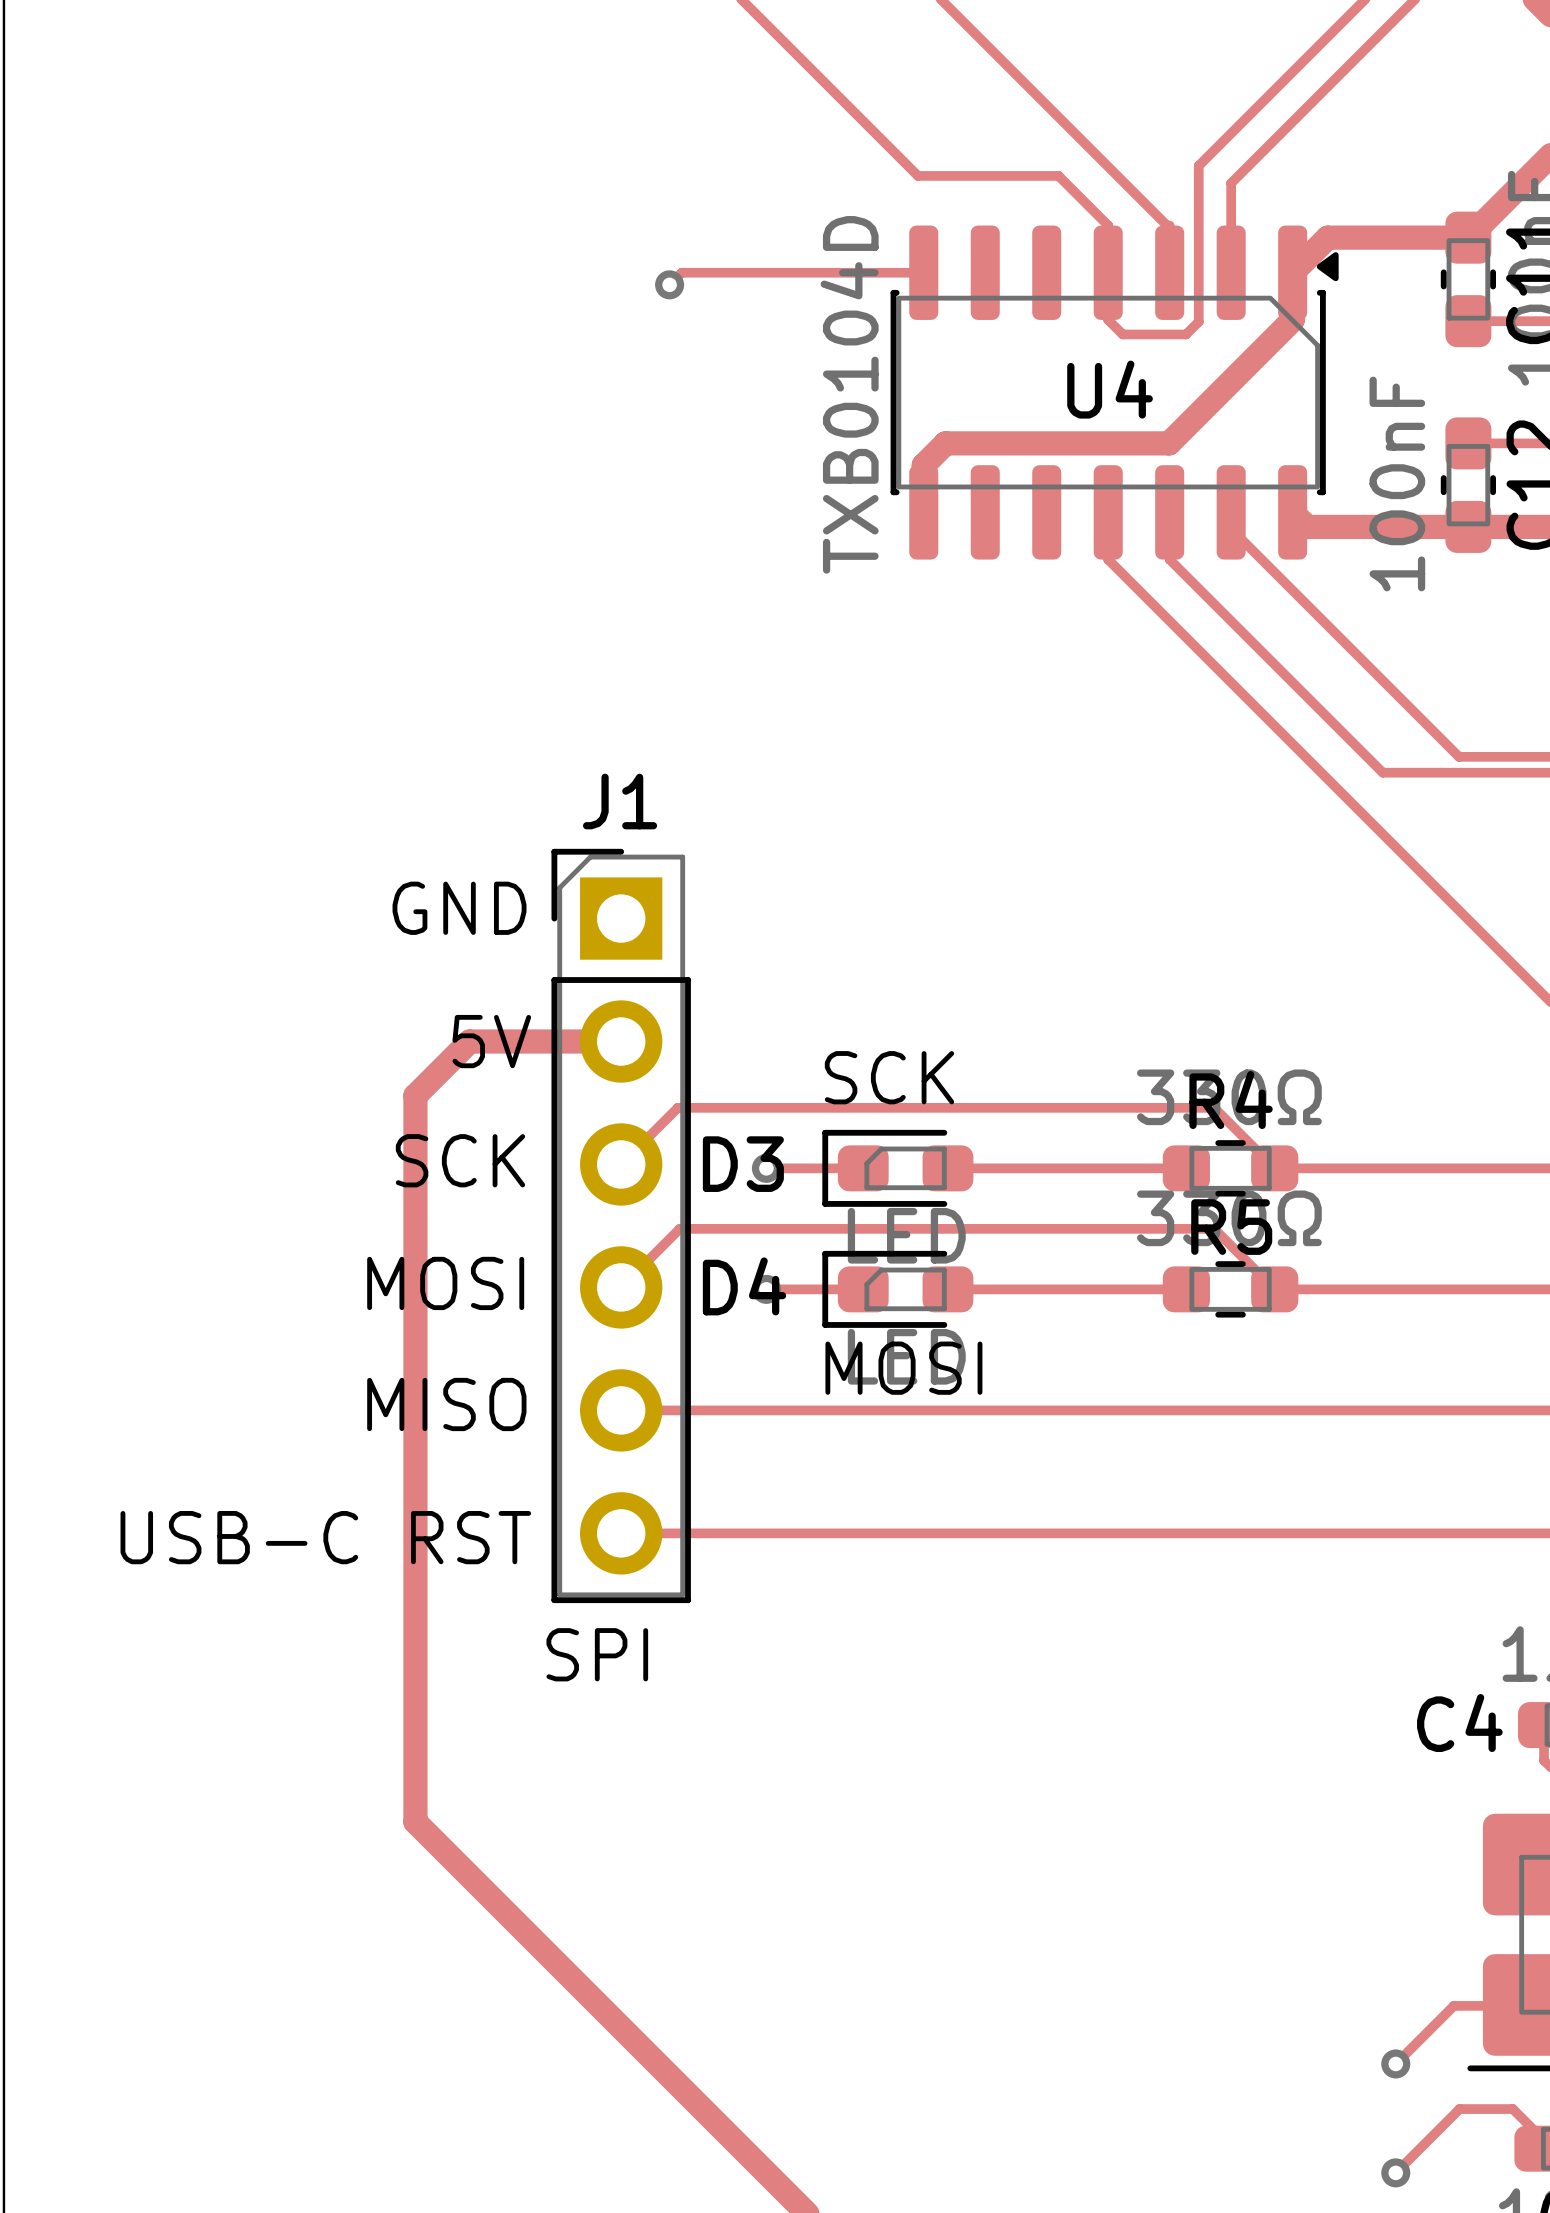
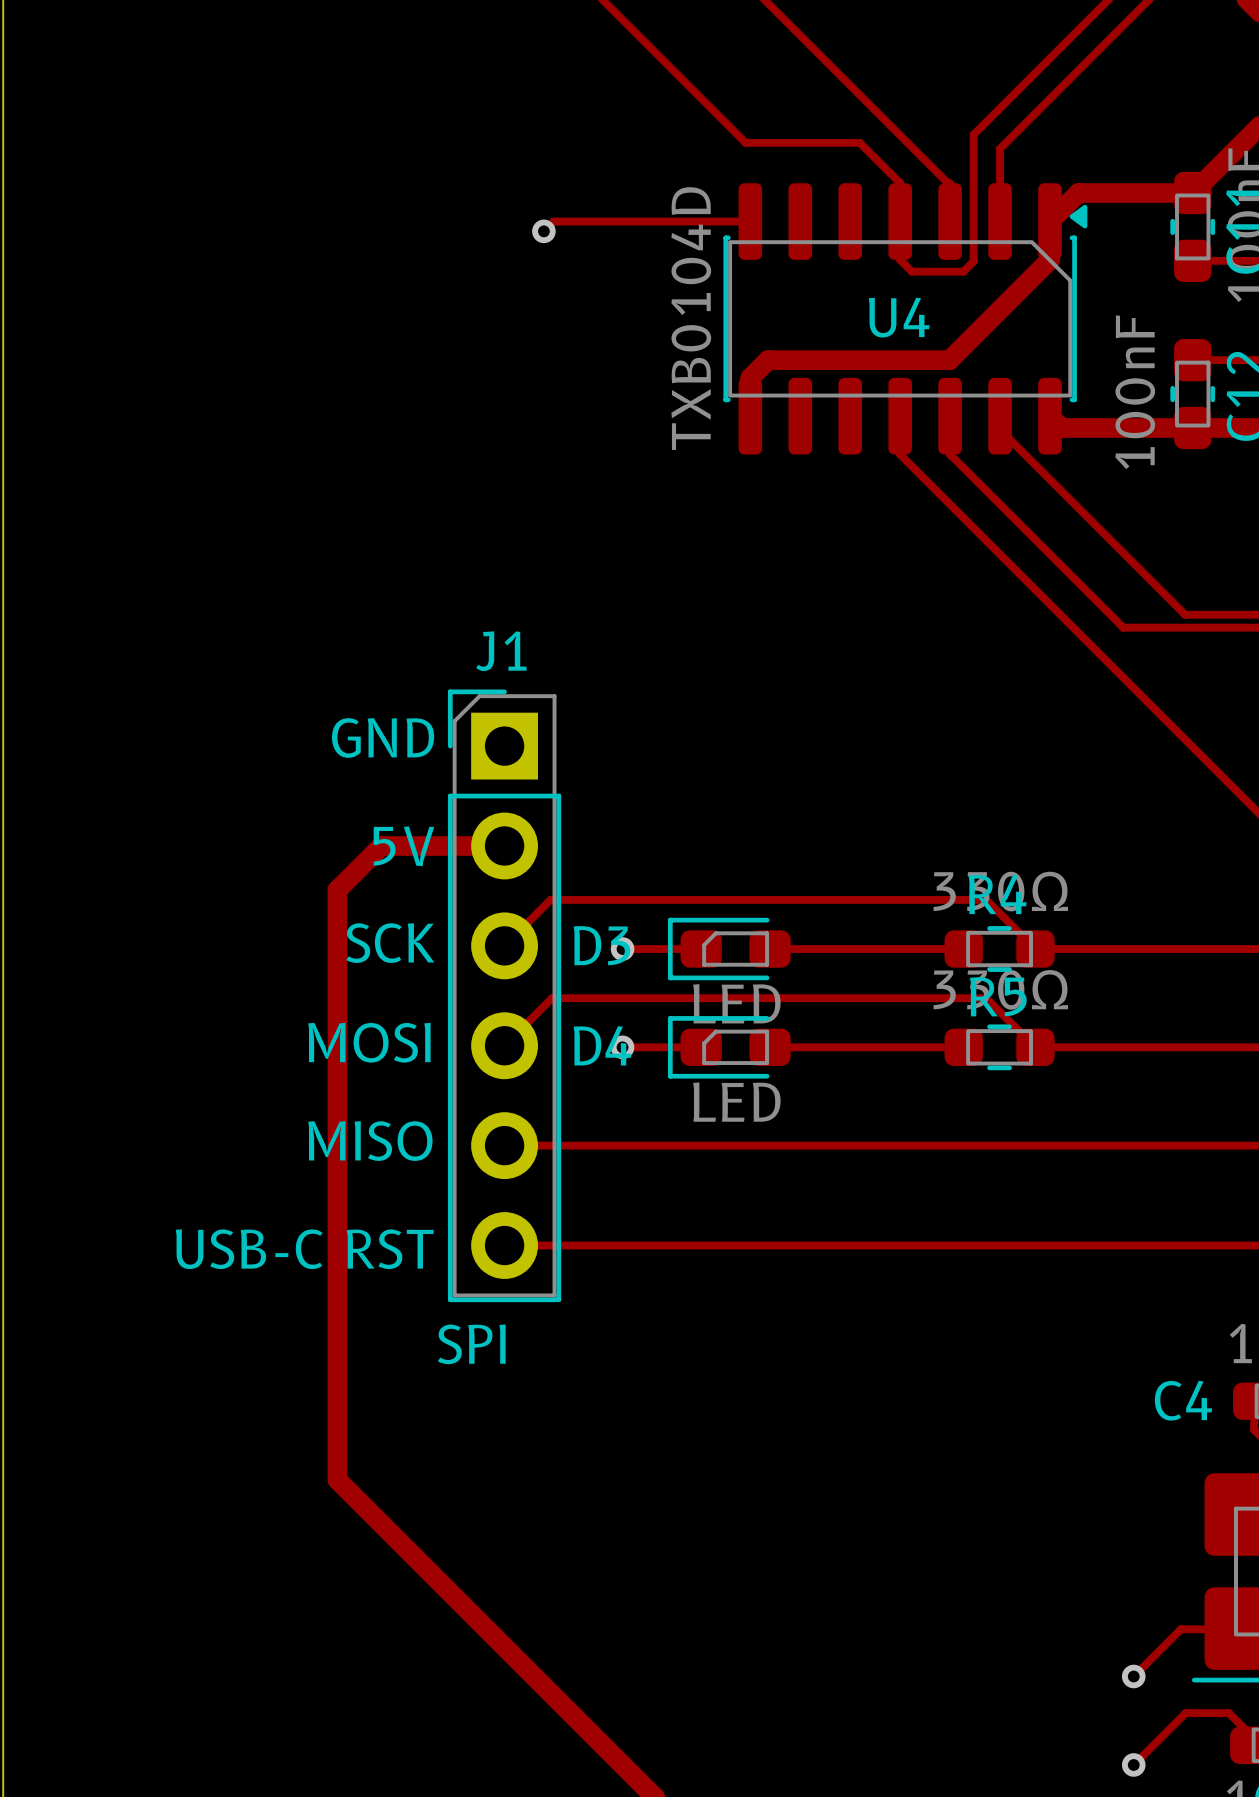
text: SCK (889, 1077) -> none
text: MOSI (903, 1368) -> none

